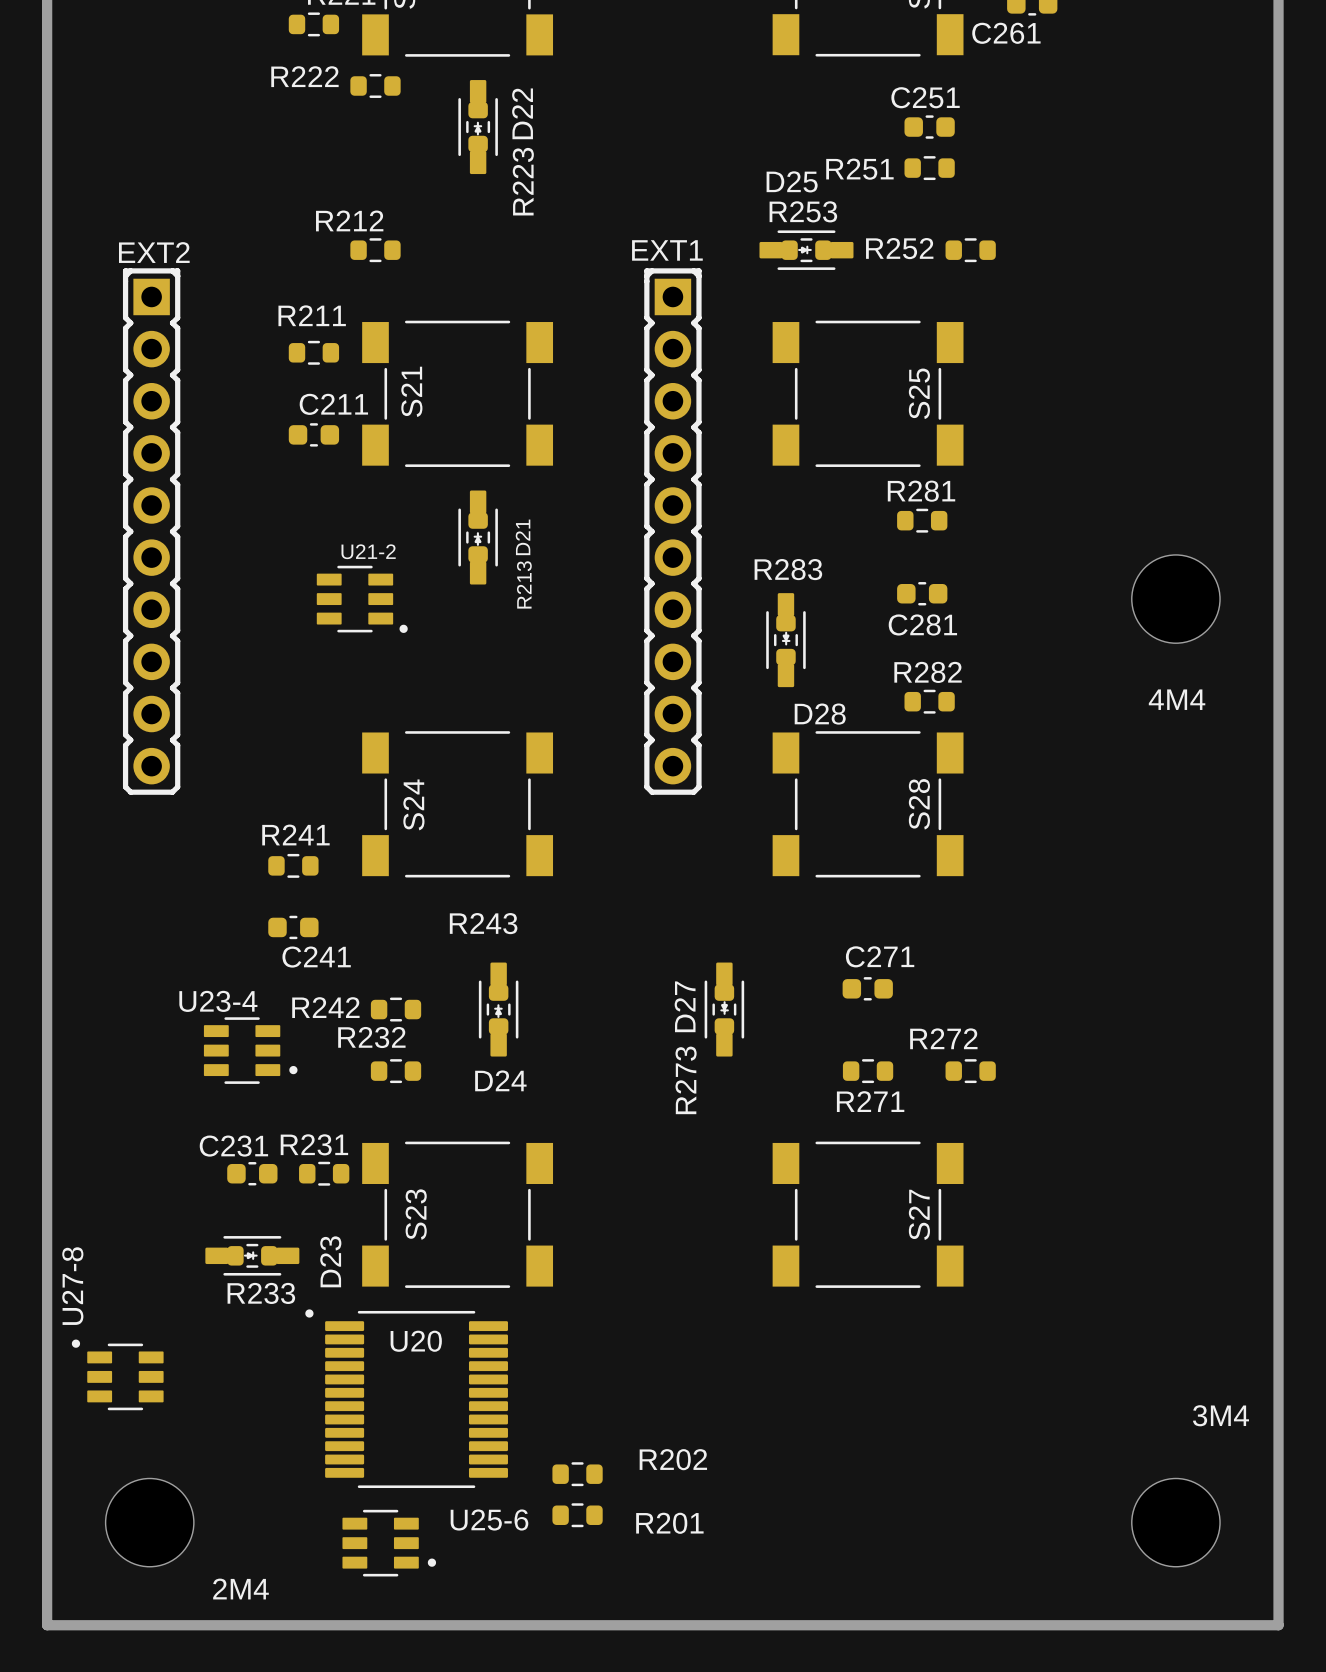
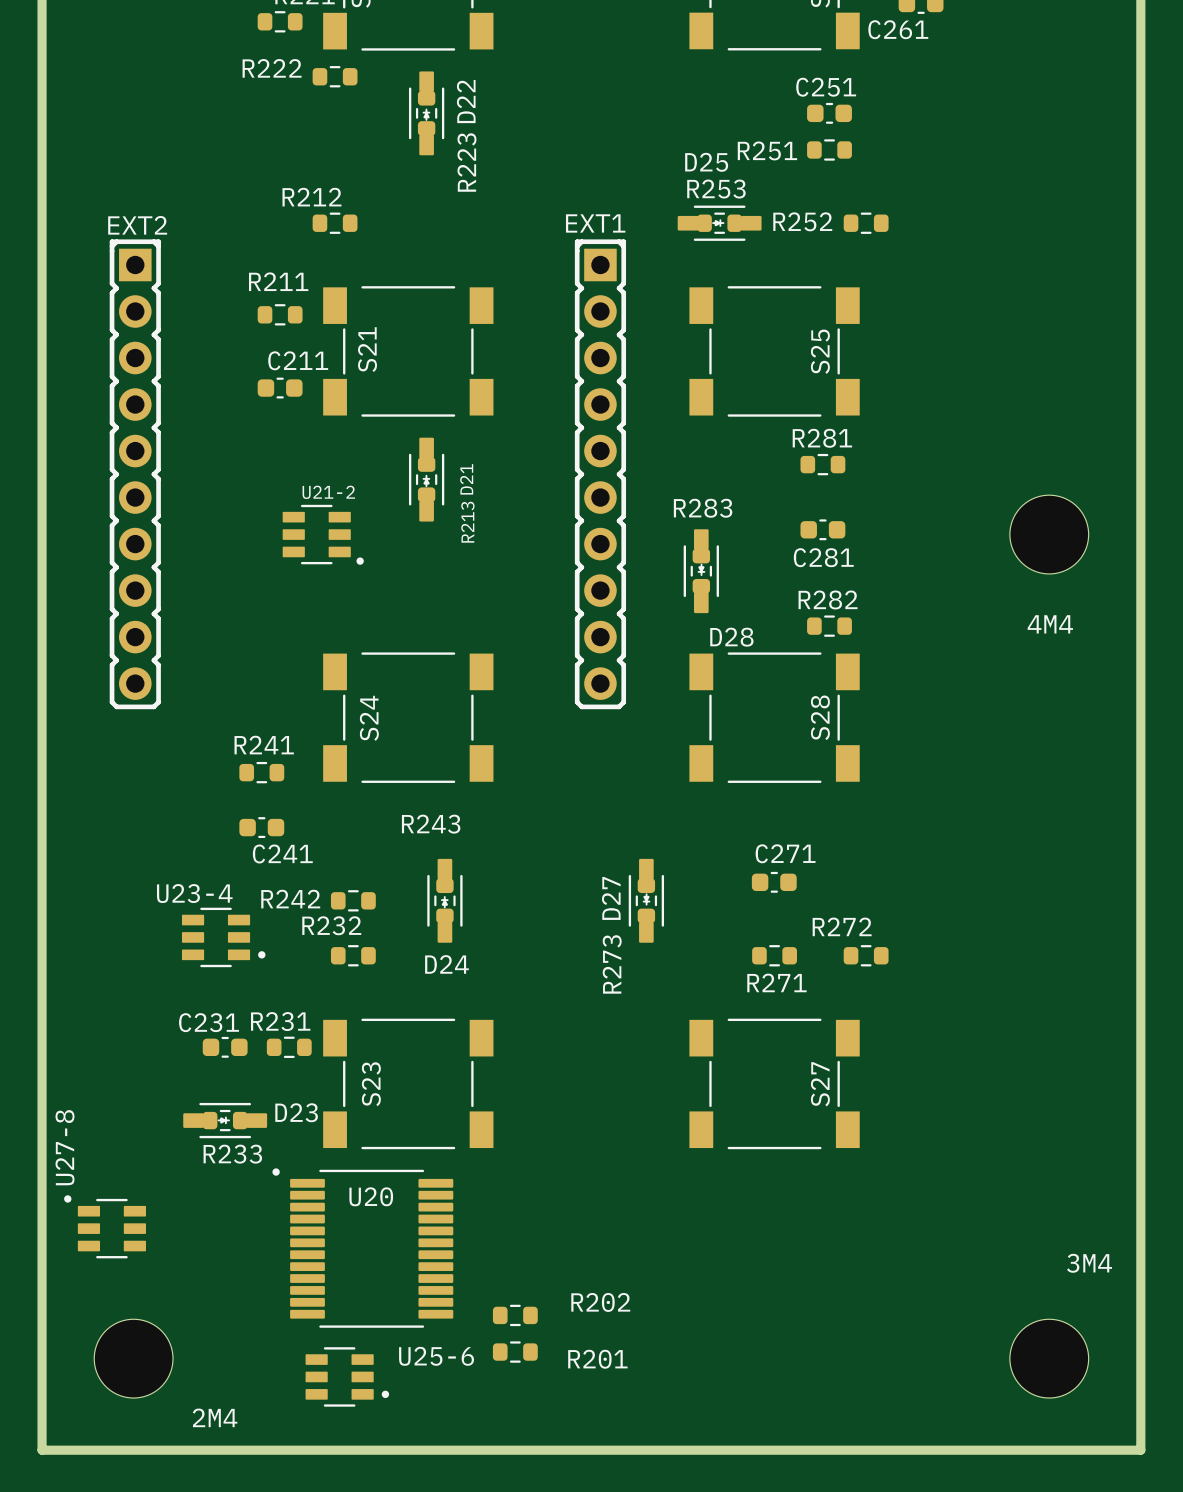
D23 name rotation: 0° (330, 1261) -> 90° clockwise (296, 1112)

